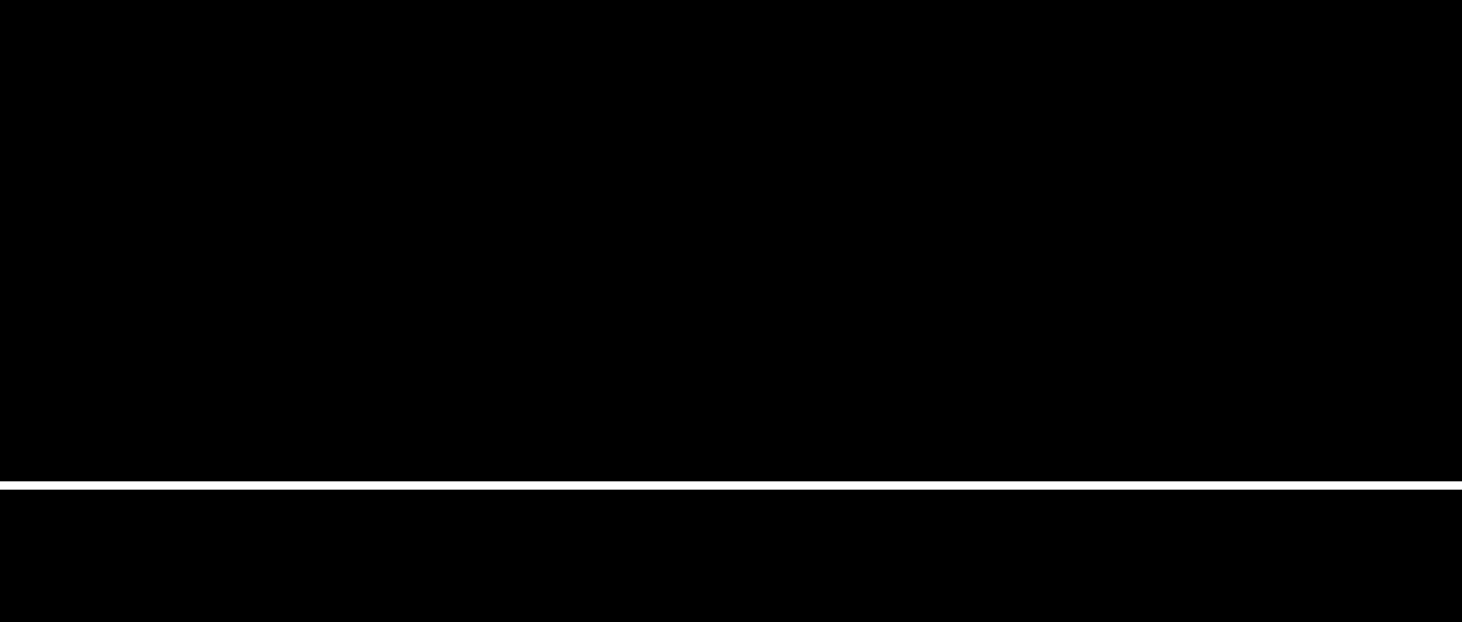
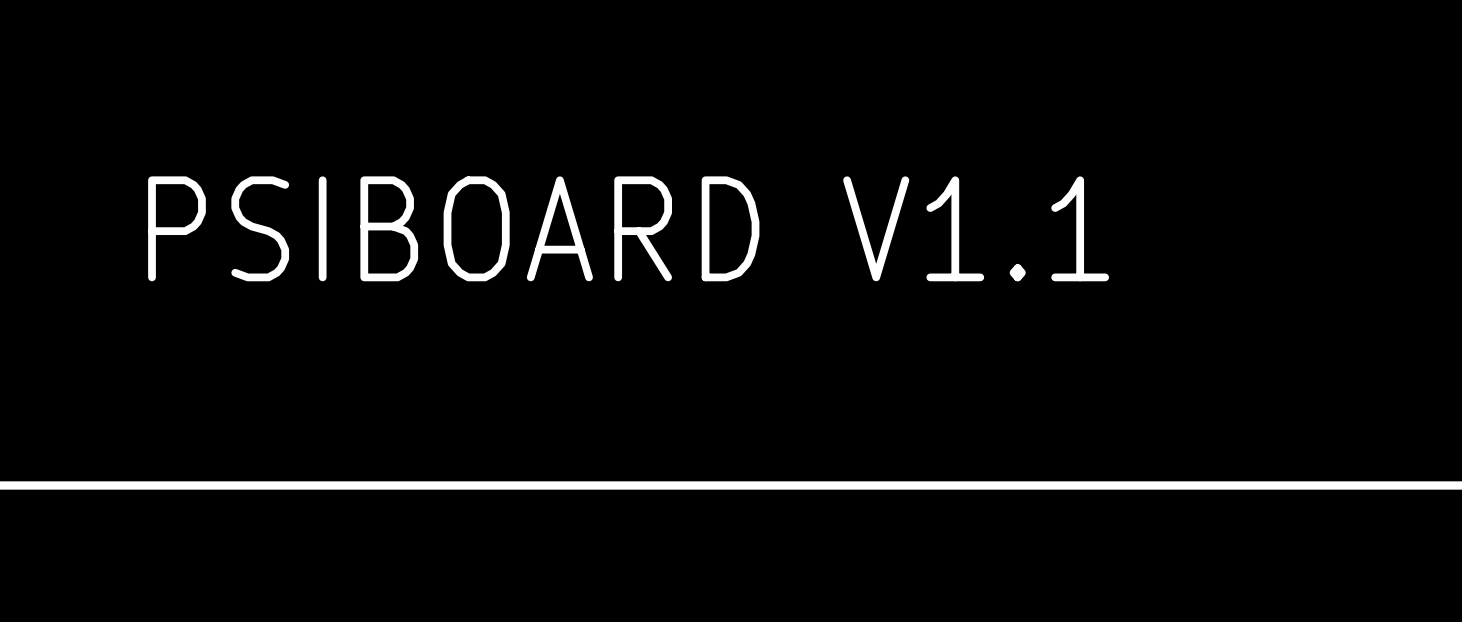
text: none -> PSIBOARD V1.1 (628, 228)

